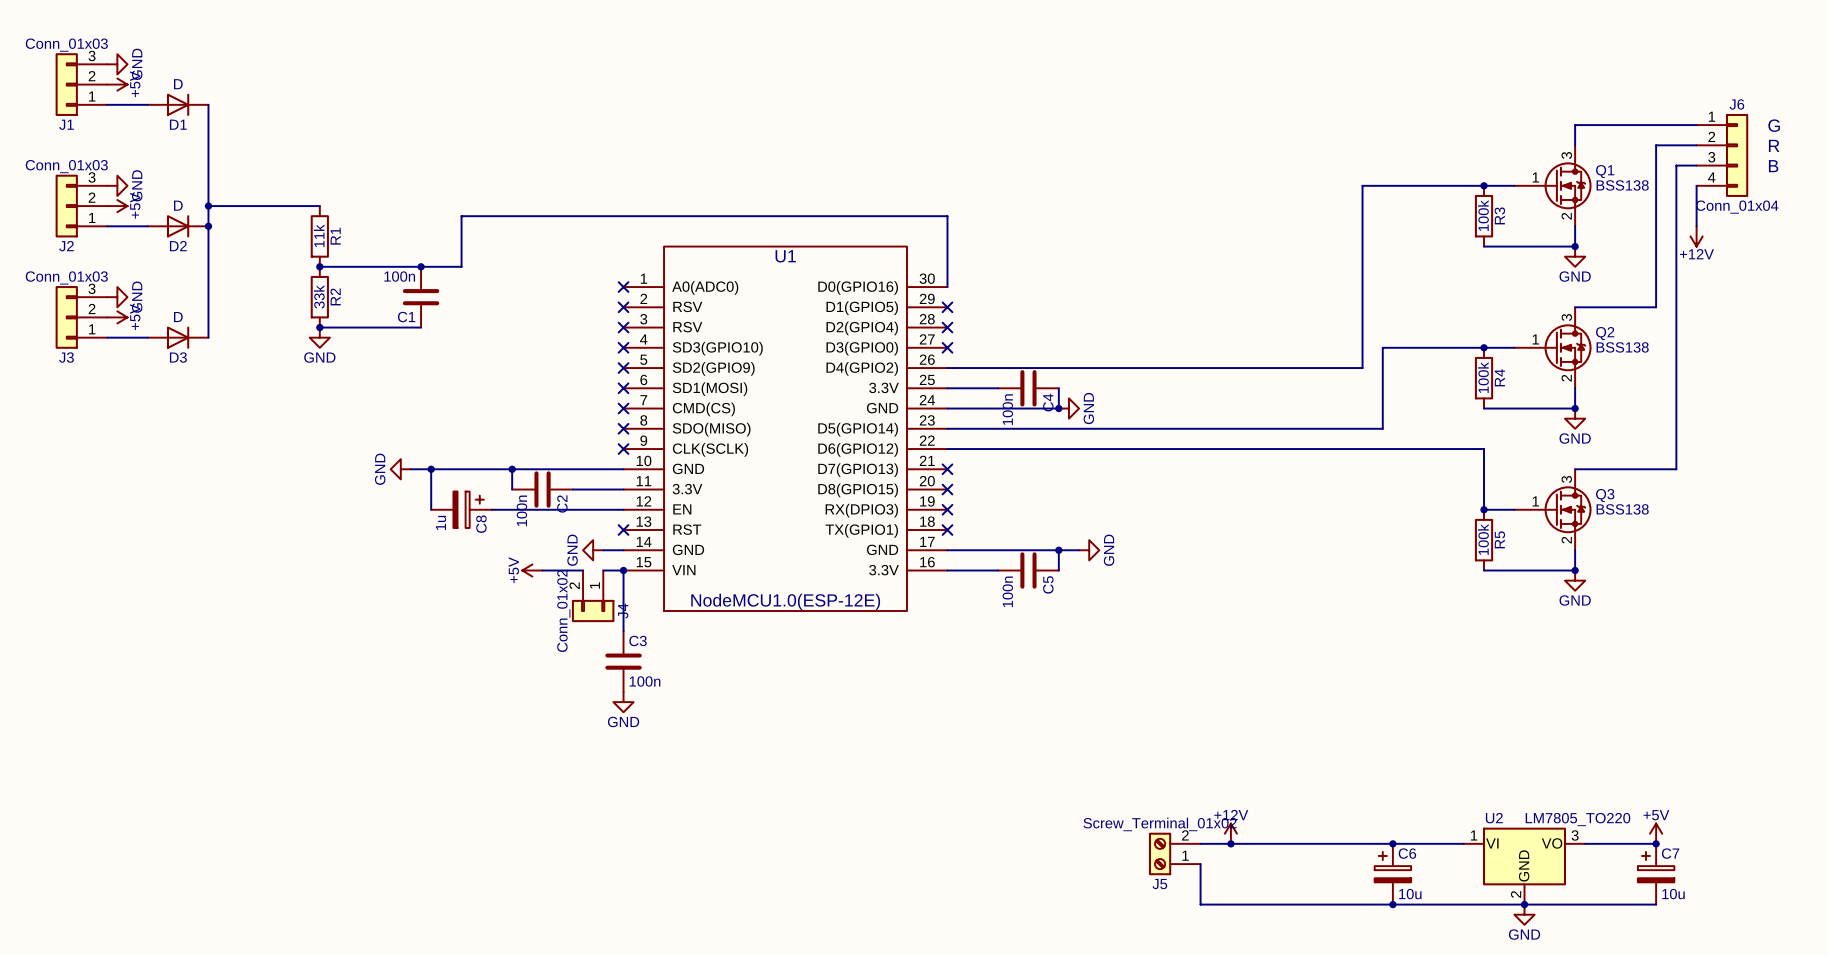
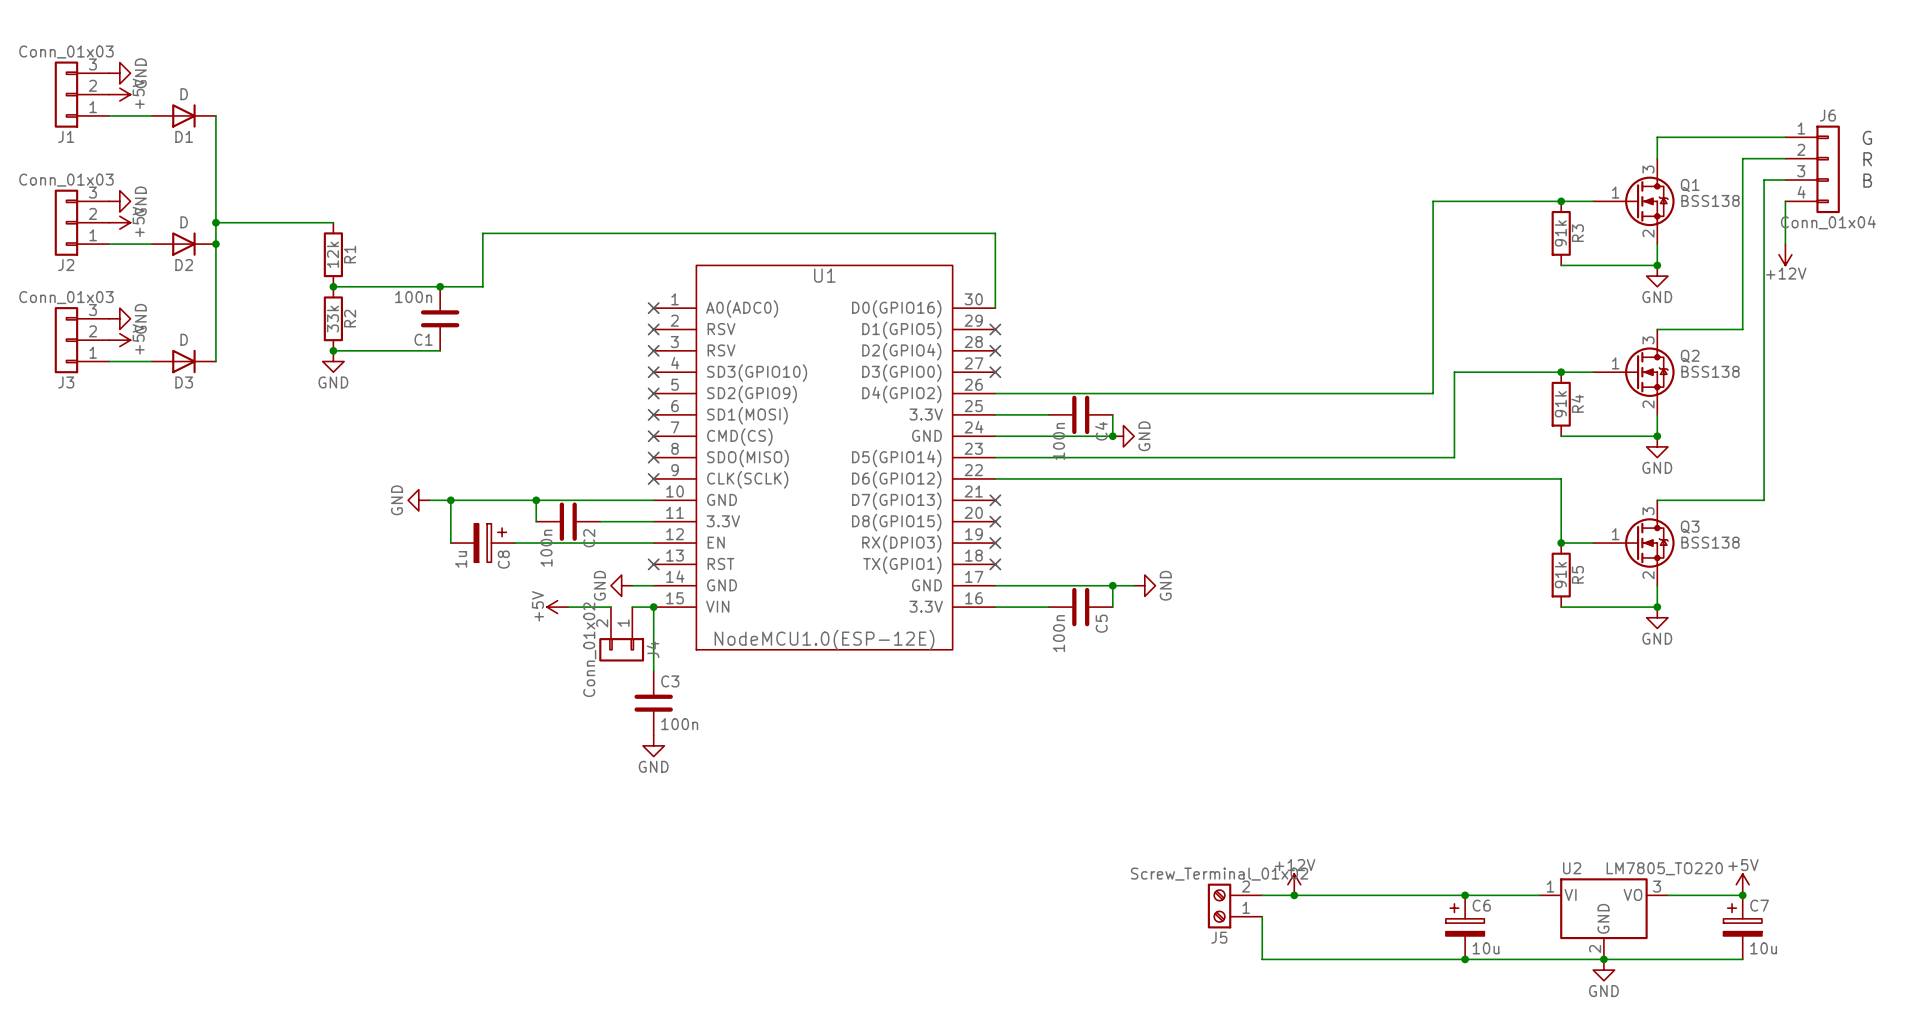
R3 value: 100k (1483, 215) -> 91k (1560, 233)
R1 value: 11k (319, 235) -> 12k (332, 254)
R4 value: 100k (1483, 377) -> 91k (1560, 404)
R5 value: 100k (1483, 539) -> 91k (1560, 575)

